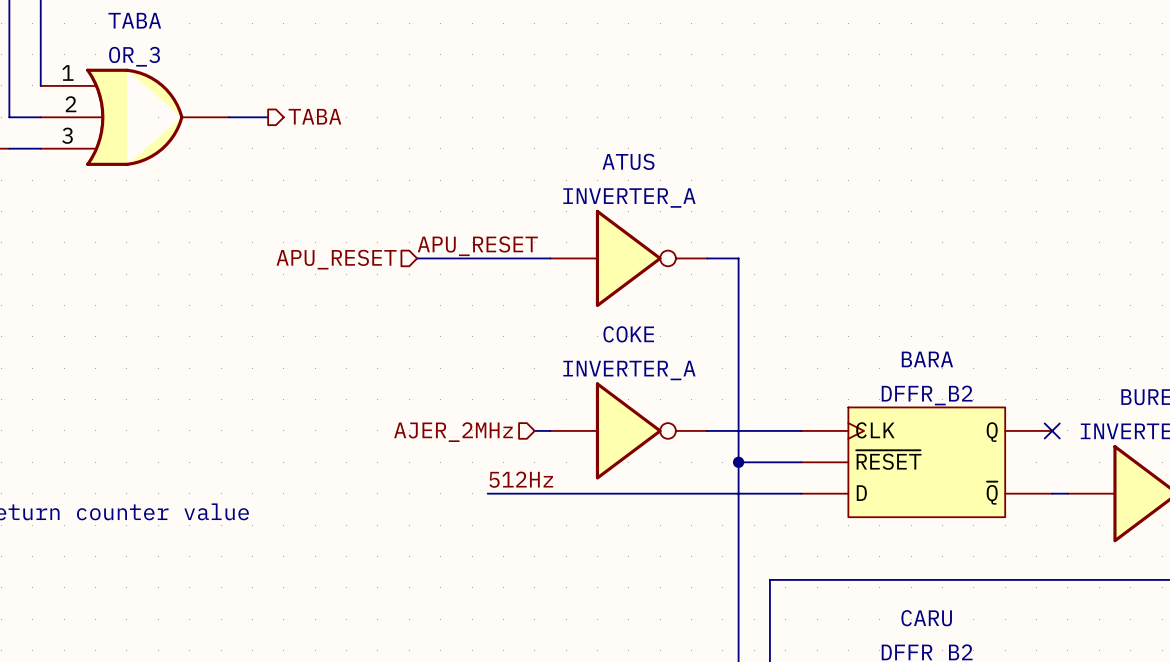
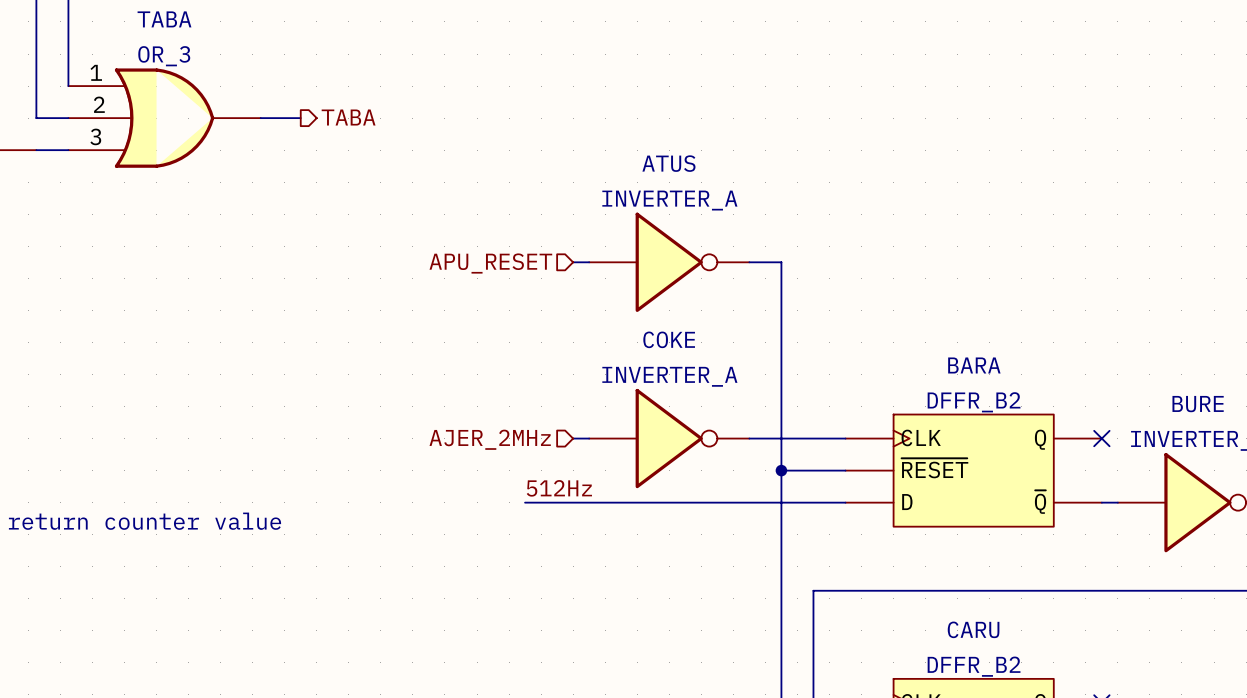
label: APU_RESET (477, 246) -> none
wire: (417, 258) (534, 258) -> none
hierarchical label position: APU_RESET (336, 259) -> APU_RESET (490, 263)

